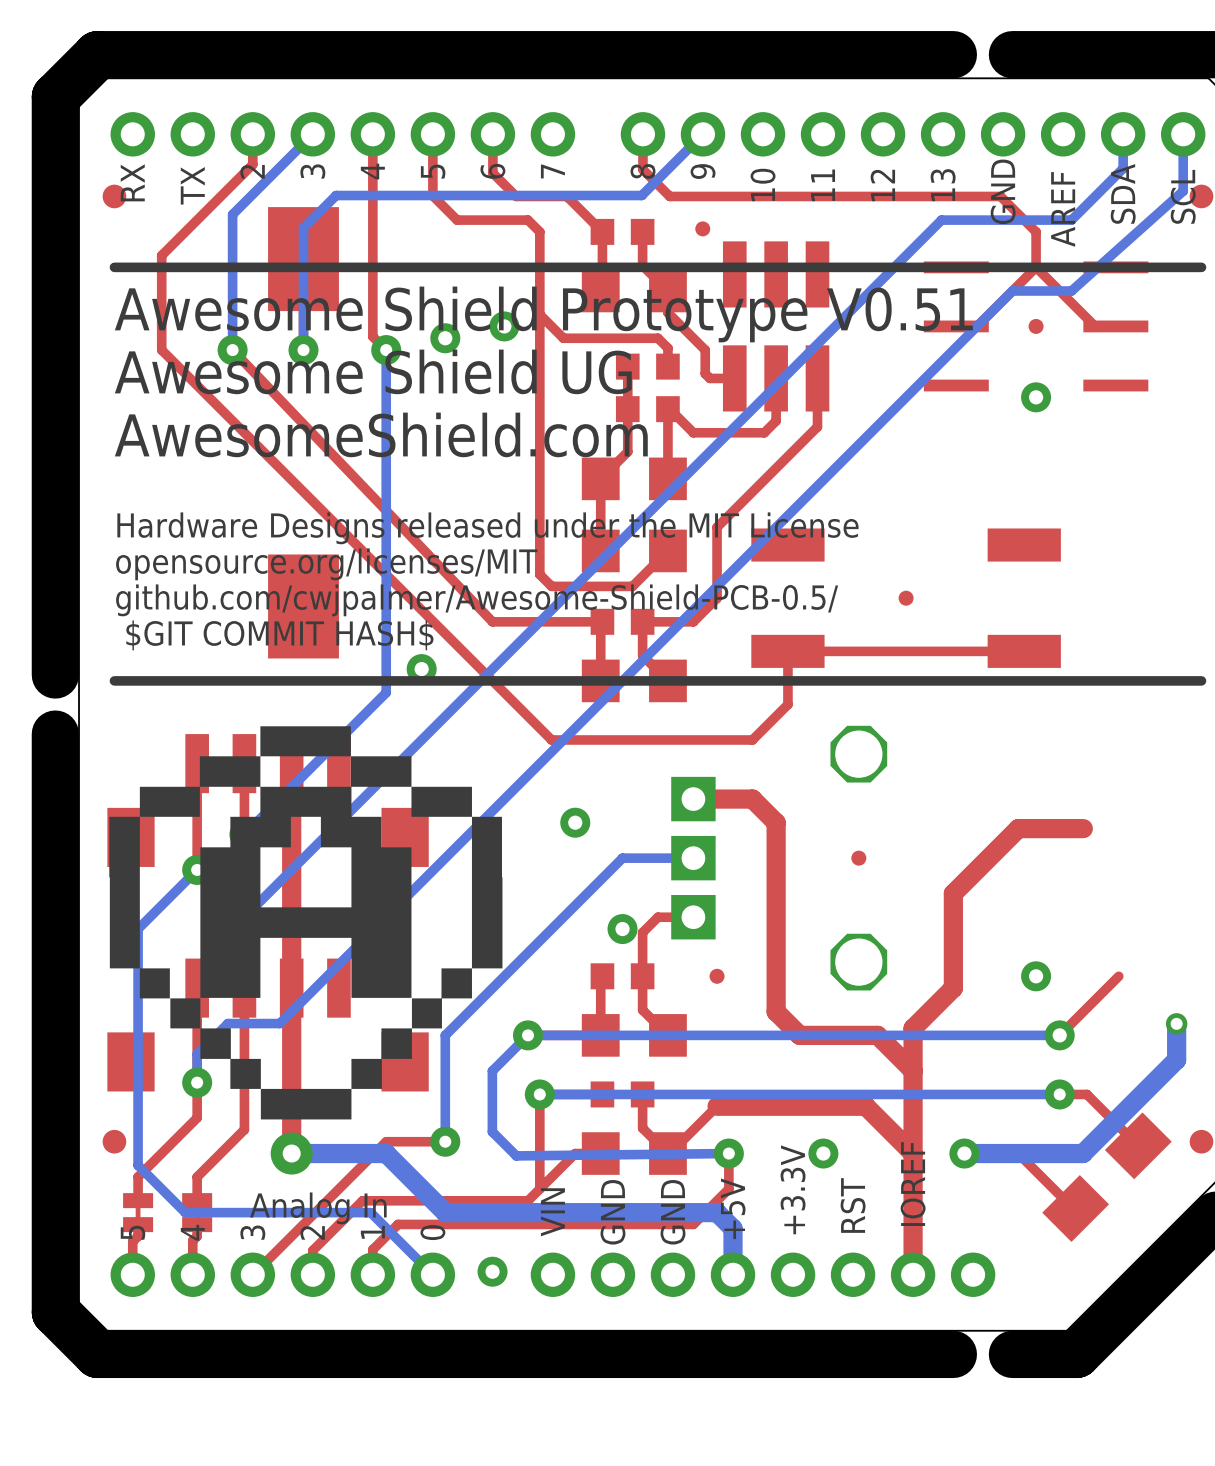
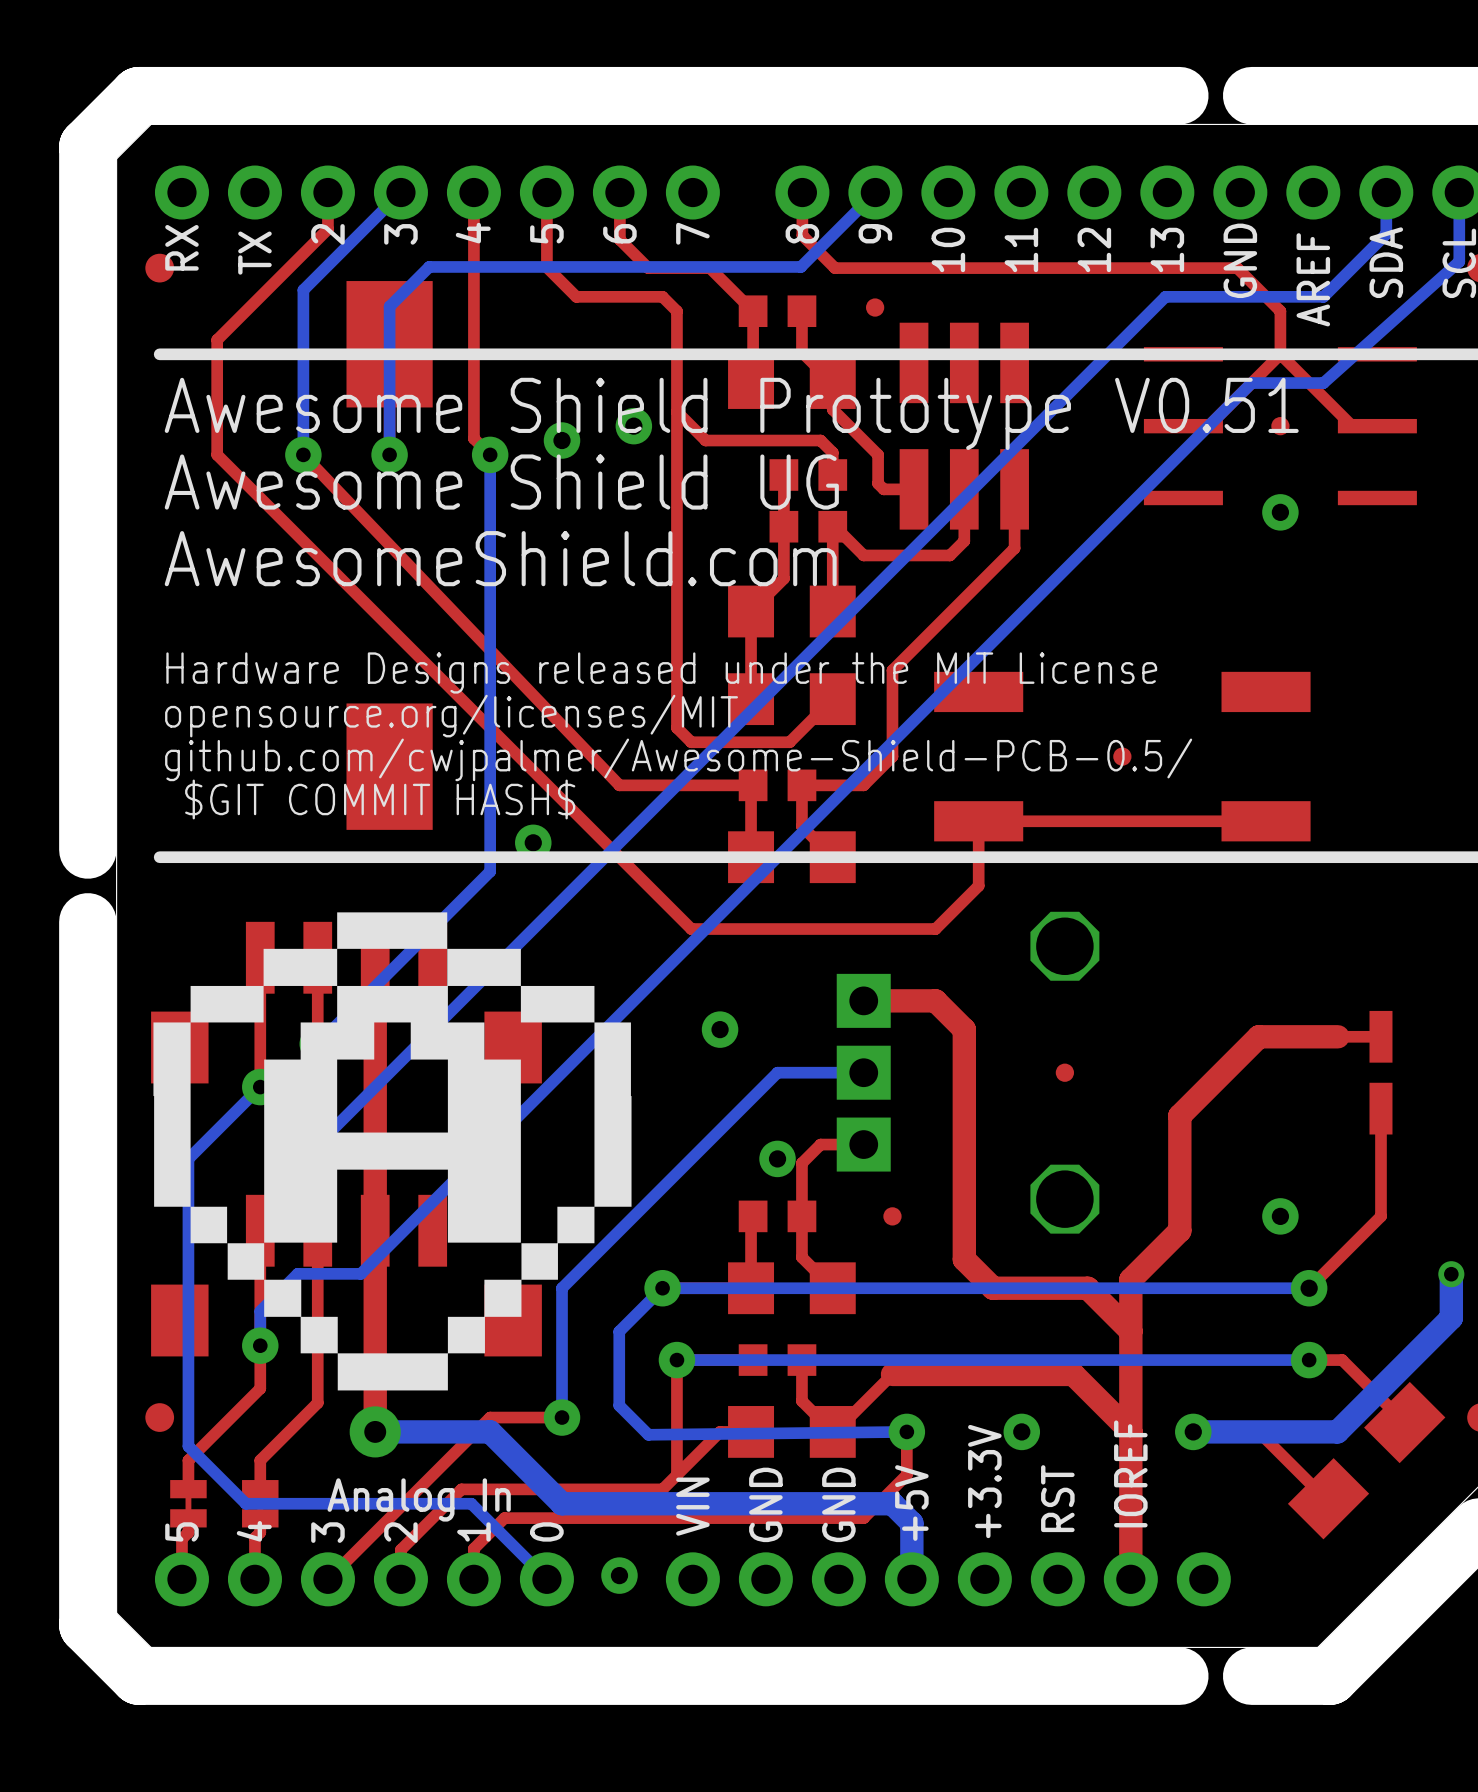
top track: none -> (1380, 1036) (1337, 1036)
part: none -> (1380, 1072)
top track: none -> (1380, 1108) (1380, 1216)

